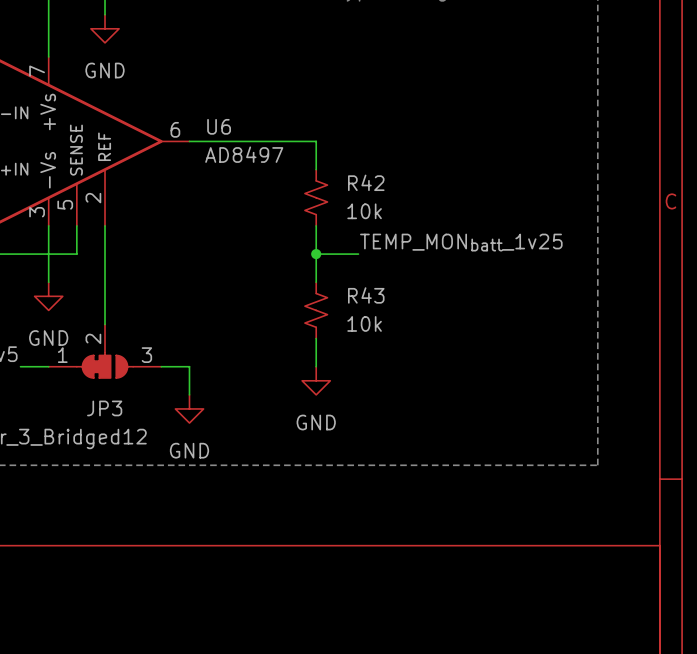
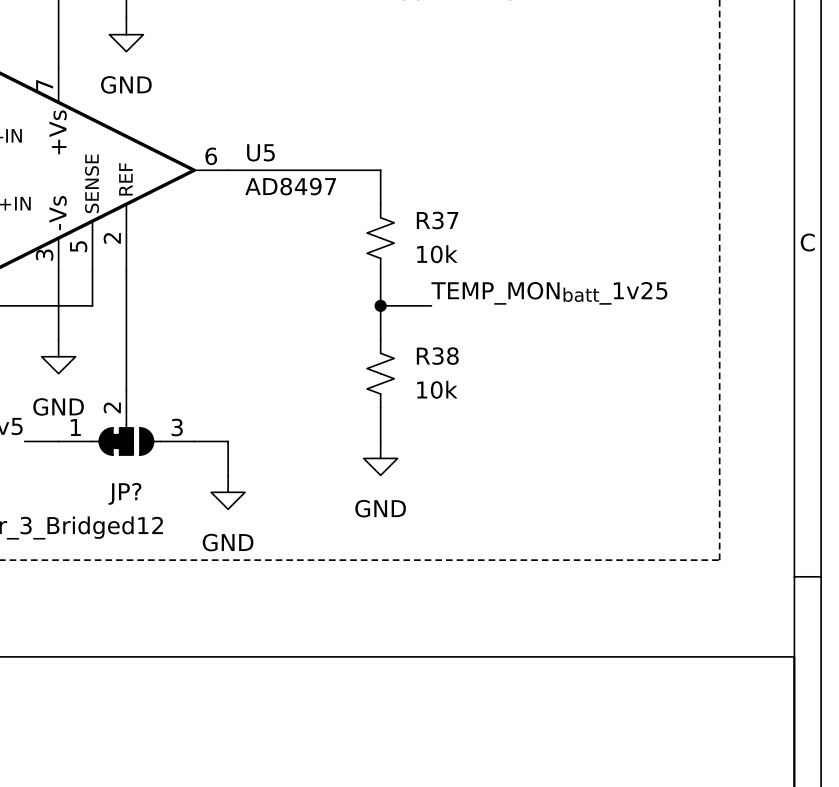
U6 name: U6 (219, 126) -> U5 (260, 152)
R42 name: R42 (366, 182) -> R37 (437, 220)
R43 name: R43 (366, 295) -> R38 (437, 356)
JP3 name: JP3 (104, 408) -> JP? (125, 493)

